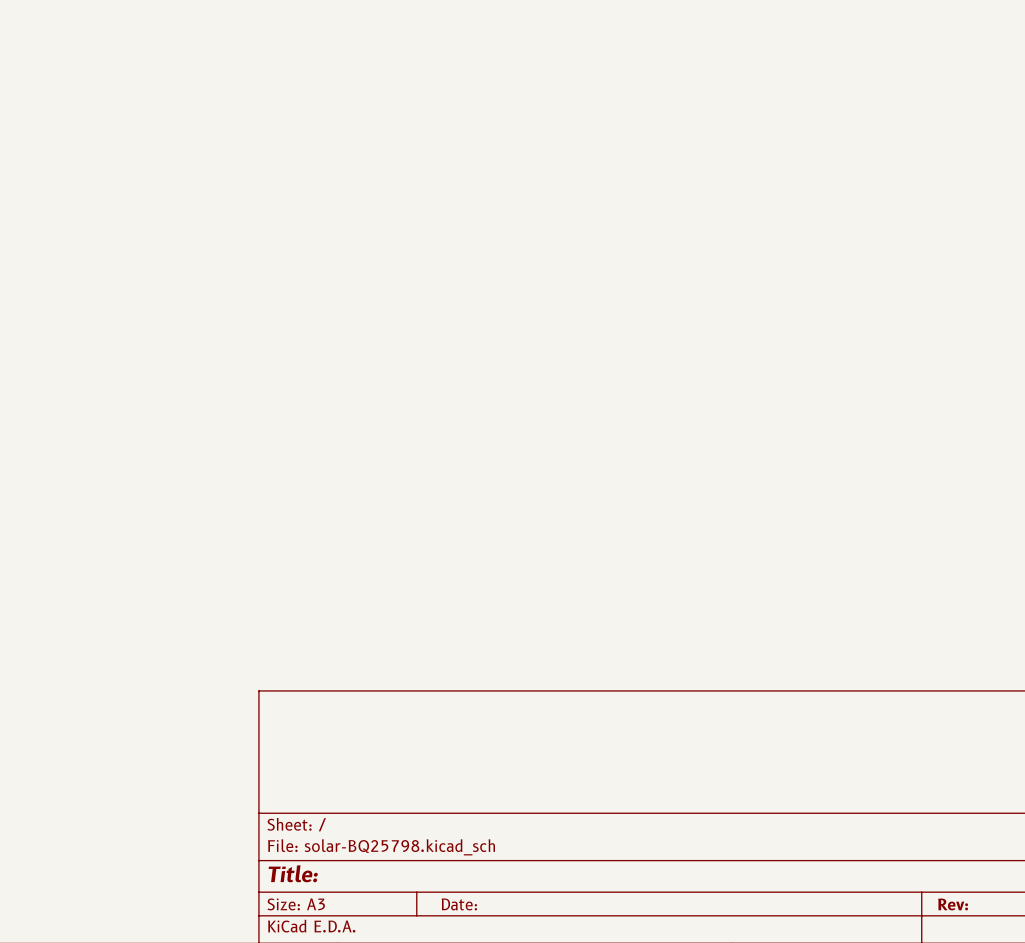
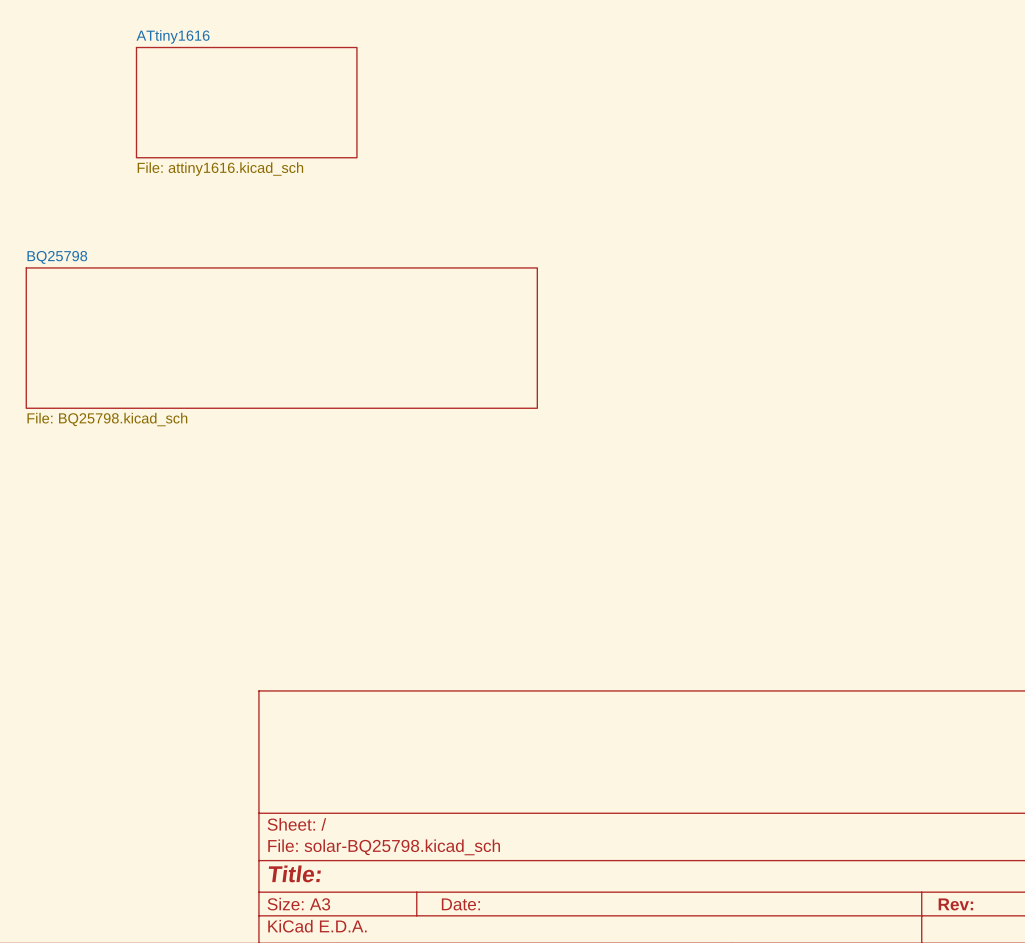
sheet ATtiny1616: none -> File: attiny1616.kicad_sch (246, 102)
sheet BQ25798: none -> File: BQ25798.kicad_sch (281, 338)

